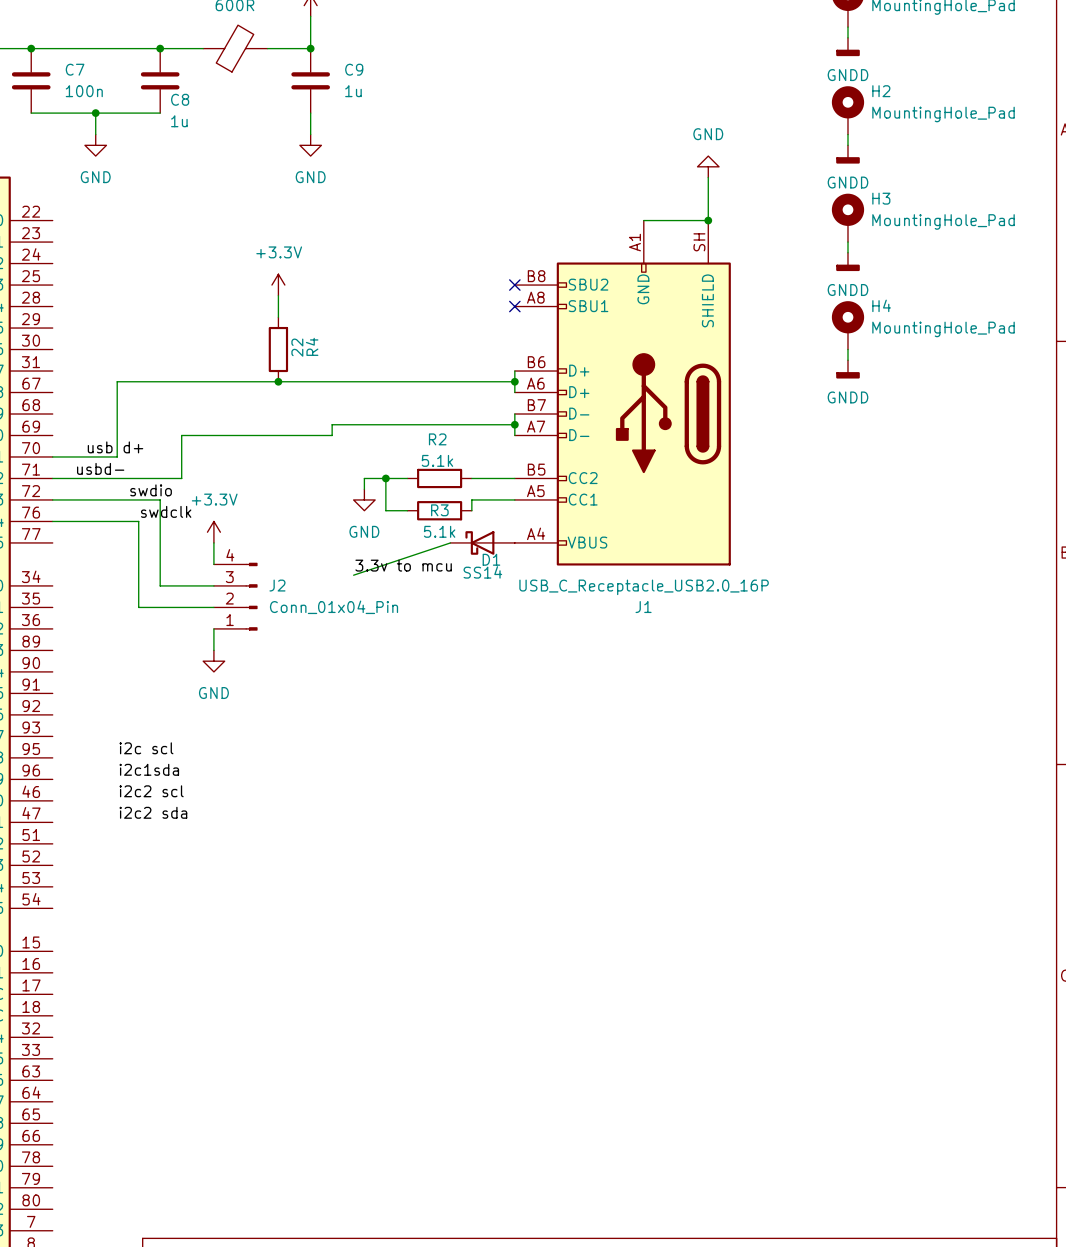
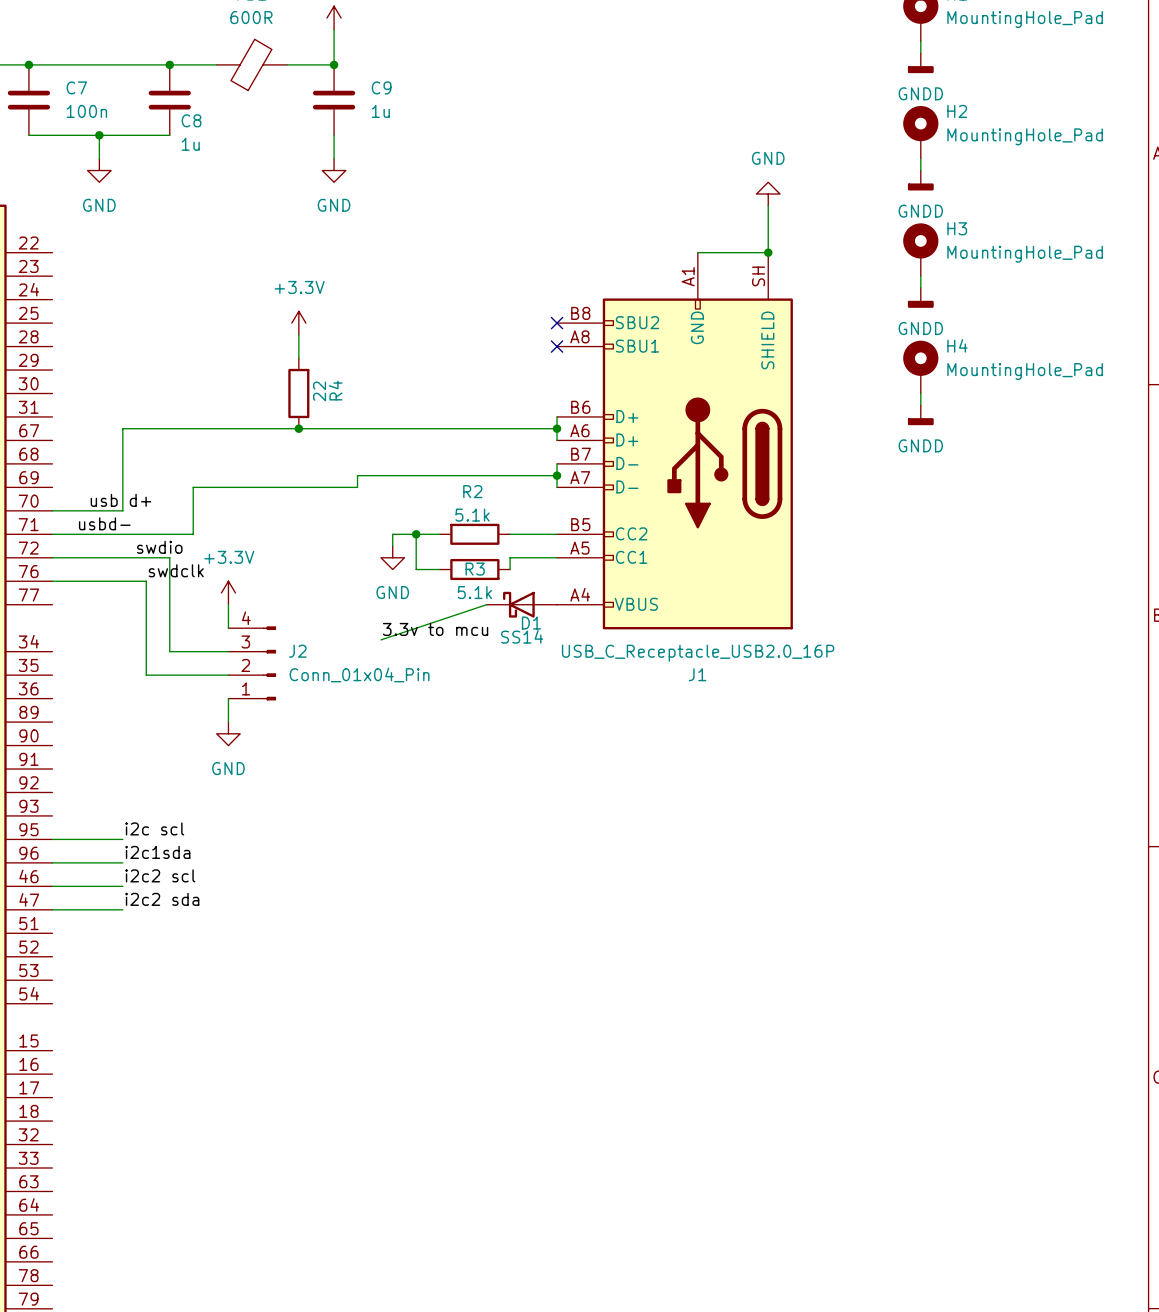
wire: none -> (52, 839) (122, 839)
wire: none -> (52, 862) (122, 862)
wire: none -> (52, 886) (122, 886)
wire: none -> (52, 909) (122, 909)

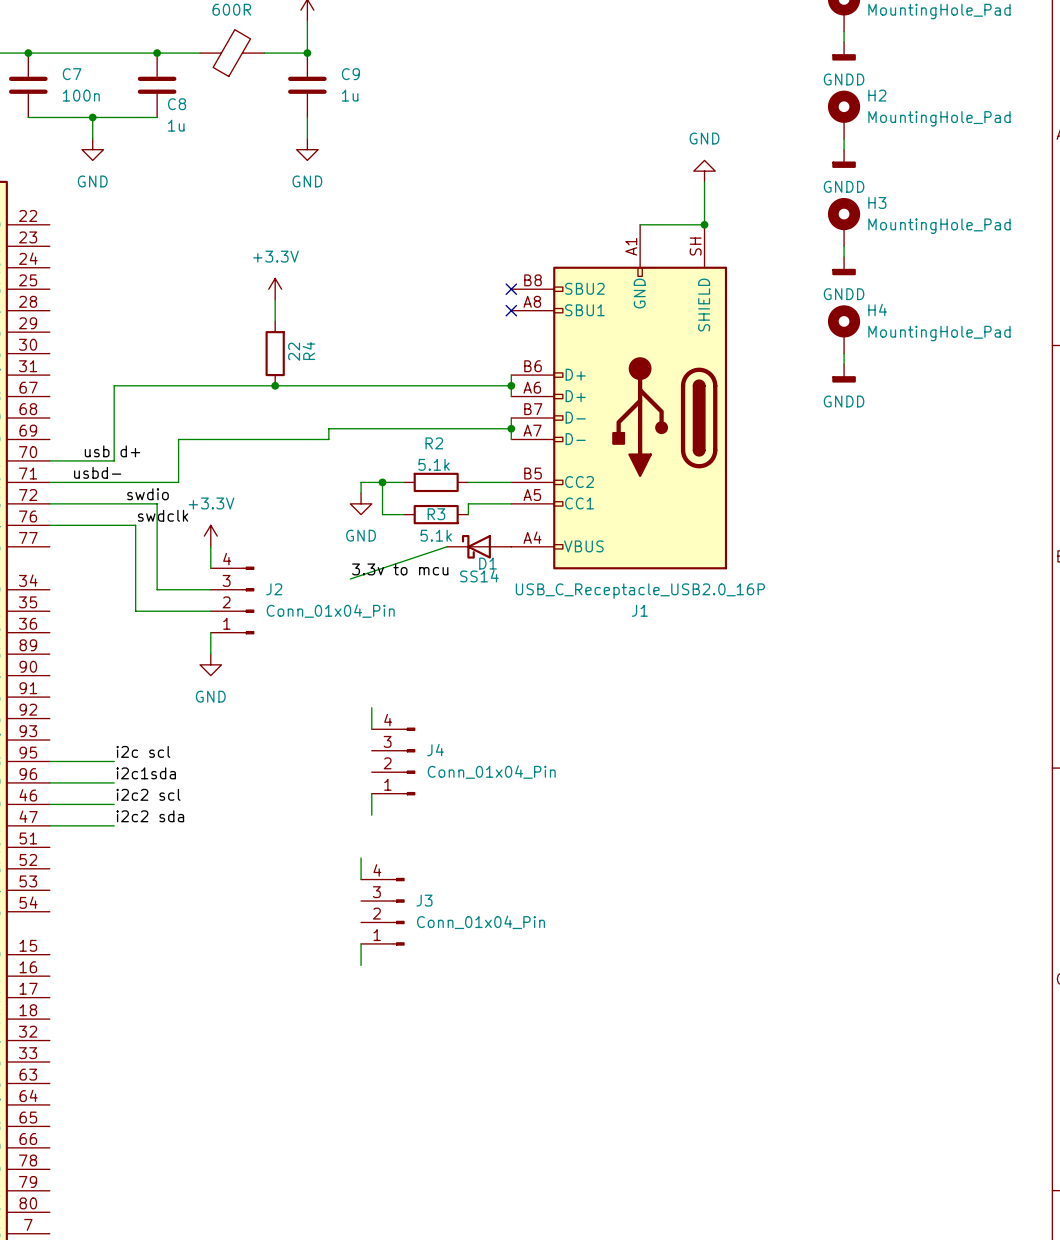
wire: none -> (371, 707) (371, 729)
J4: none -> Conn_01x04_Pin (393, 761)
wire: none -> (371, 793) (371, 815)
wire: none -> (361, 858) (361, 879)
J3: none -> Conn_01x04_Pin (382, 911)
wire: none -> (361, 943) (361, 965)

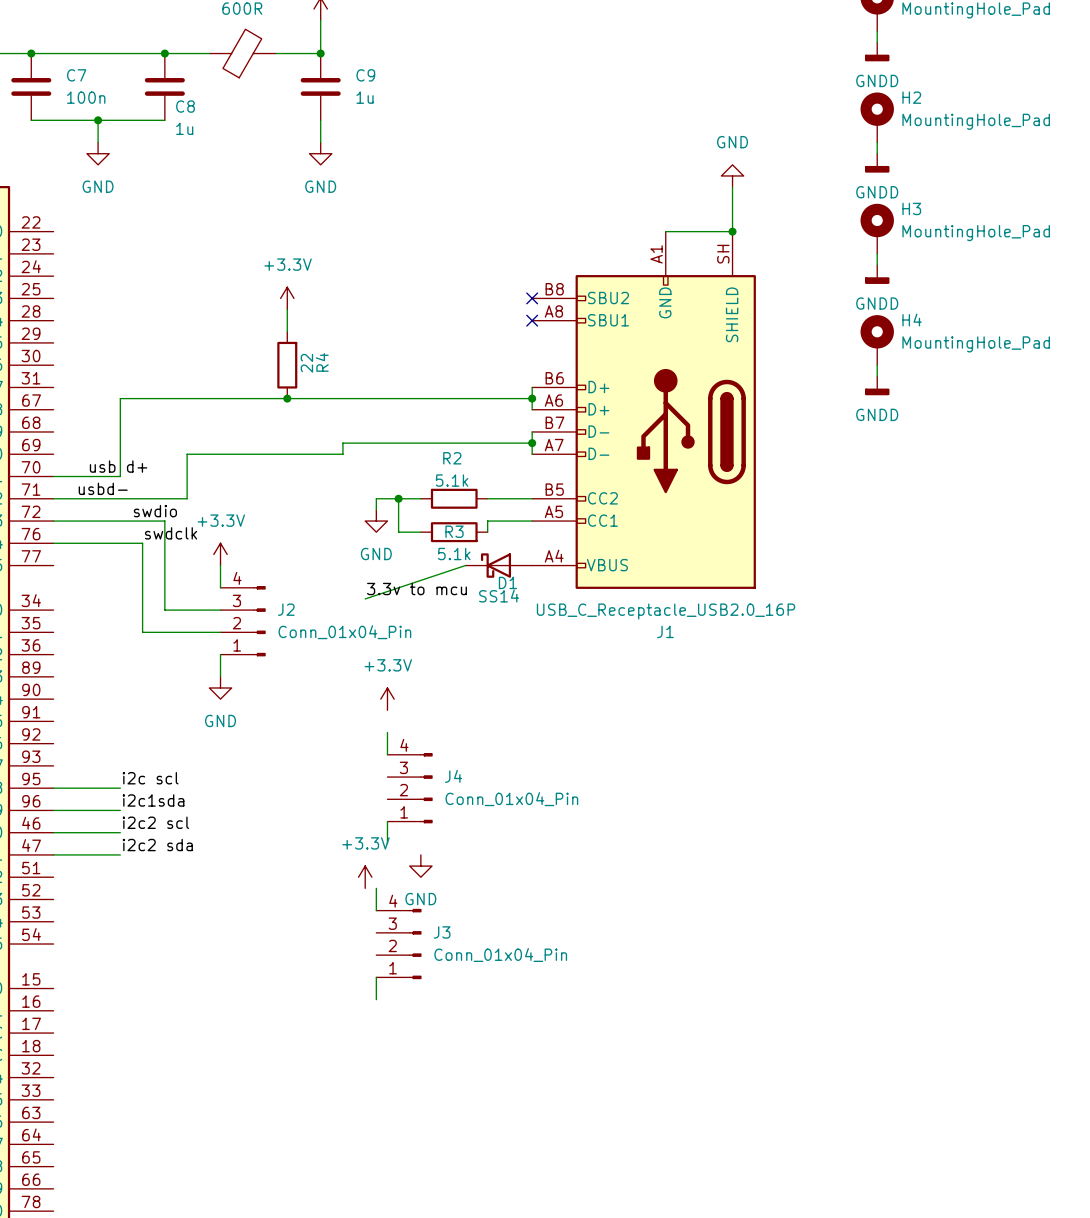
power symbol: none -> +3.3V (387, 699)
power symbol: none -> GND (420, 866)
power symbol: none -> +3.3V (365, 877)

